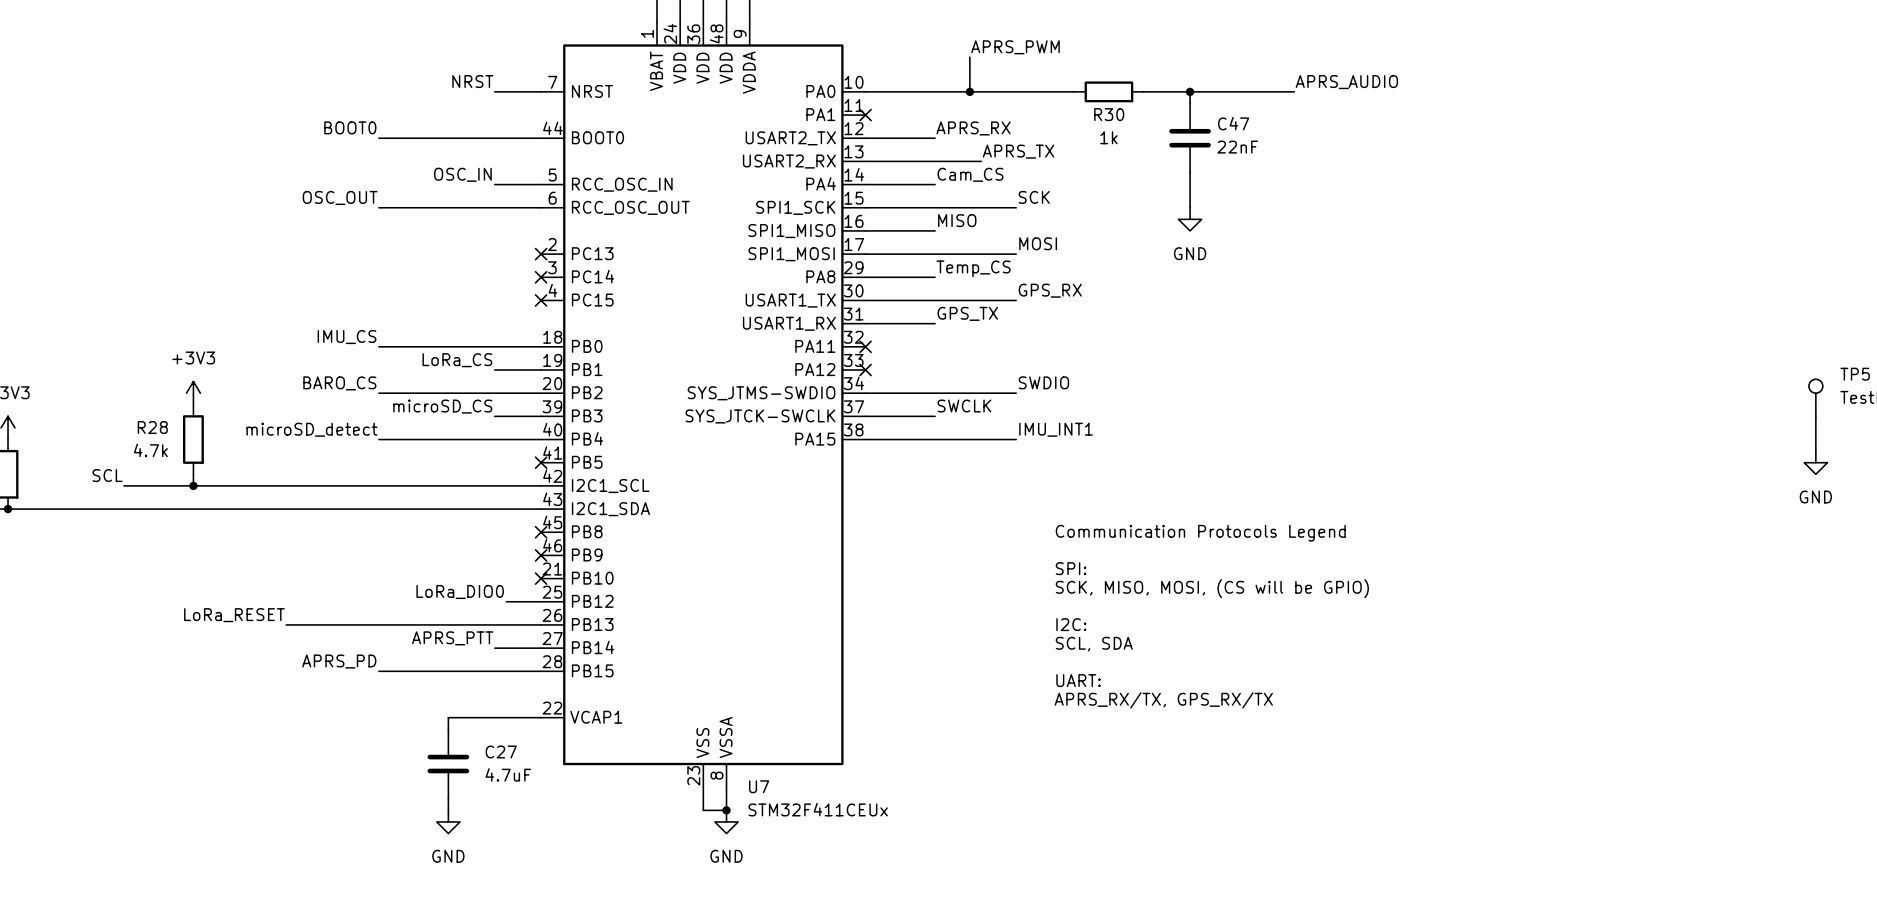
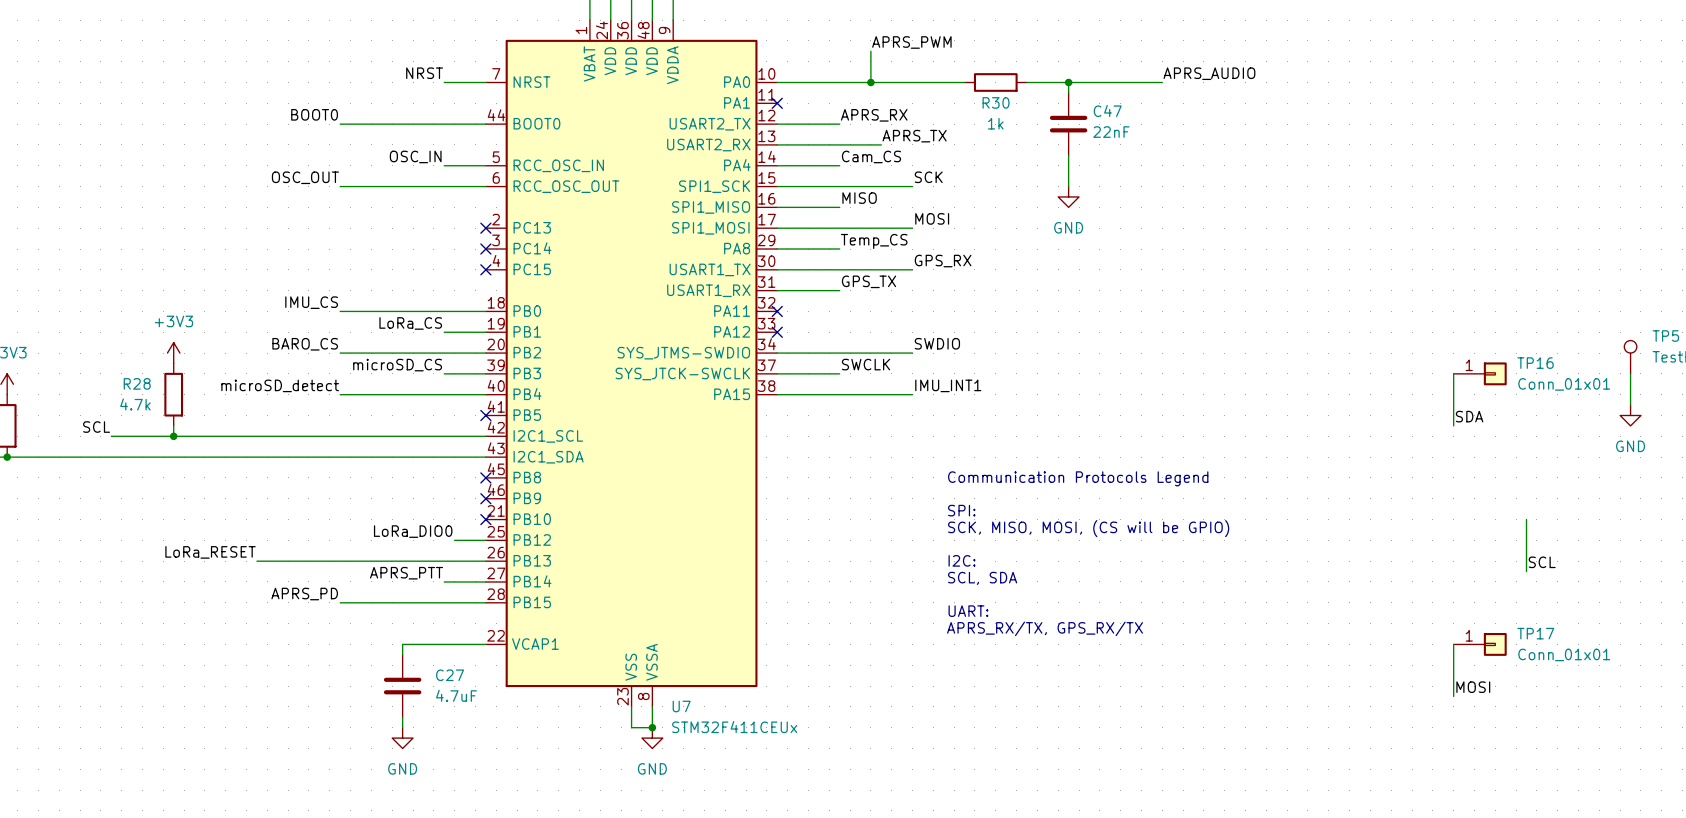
wire: none -> (1453, 373) (1453, 425)
TP16: none -> Conn_01x01 (1480, 373)
label: none -> SDA (1469, 416)
wire: none -> (1526, 519) (1526, 571)
label: none -> SCL (1542, 562)
wire: none -> (1453, 644) (1453, 696)
TP17: none -> Conn_01x01 (1480, 644)
label: none -> MOSI (1473, 687)

